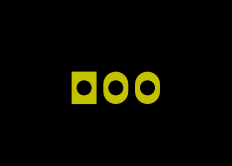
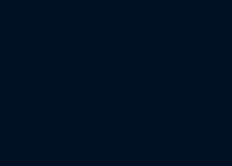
part: (115, 87) -> none

